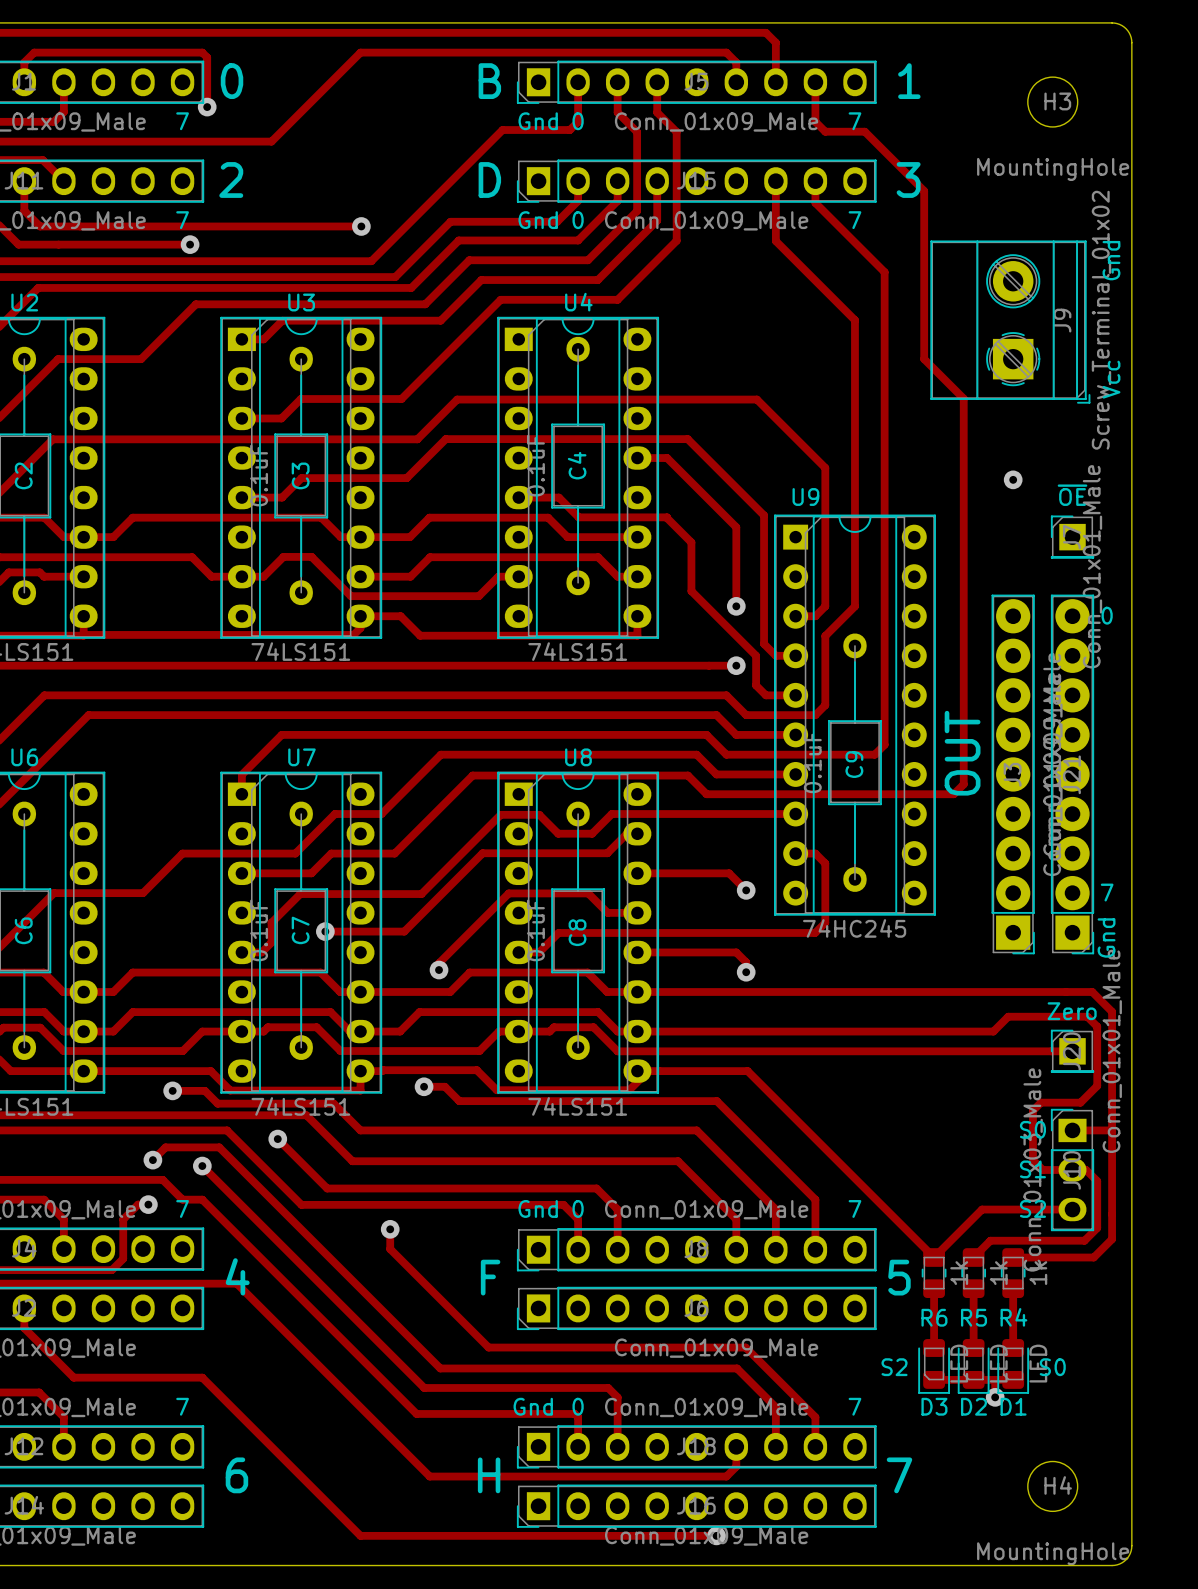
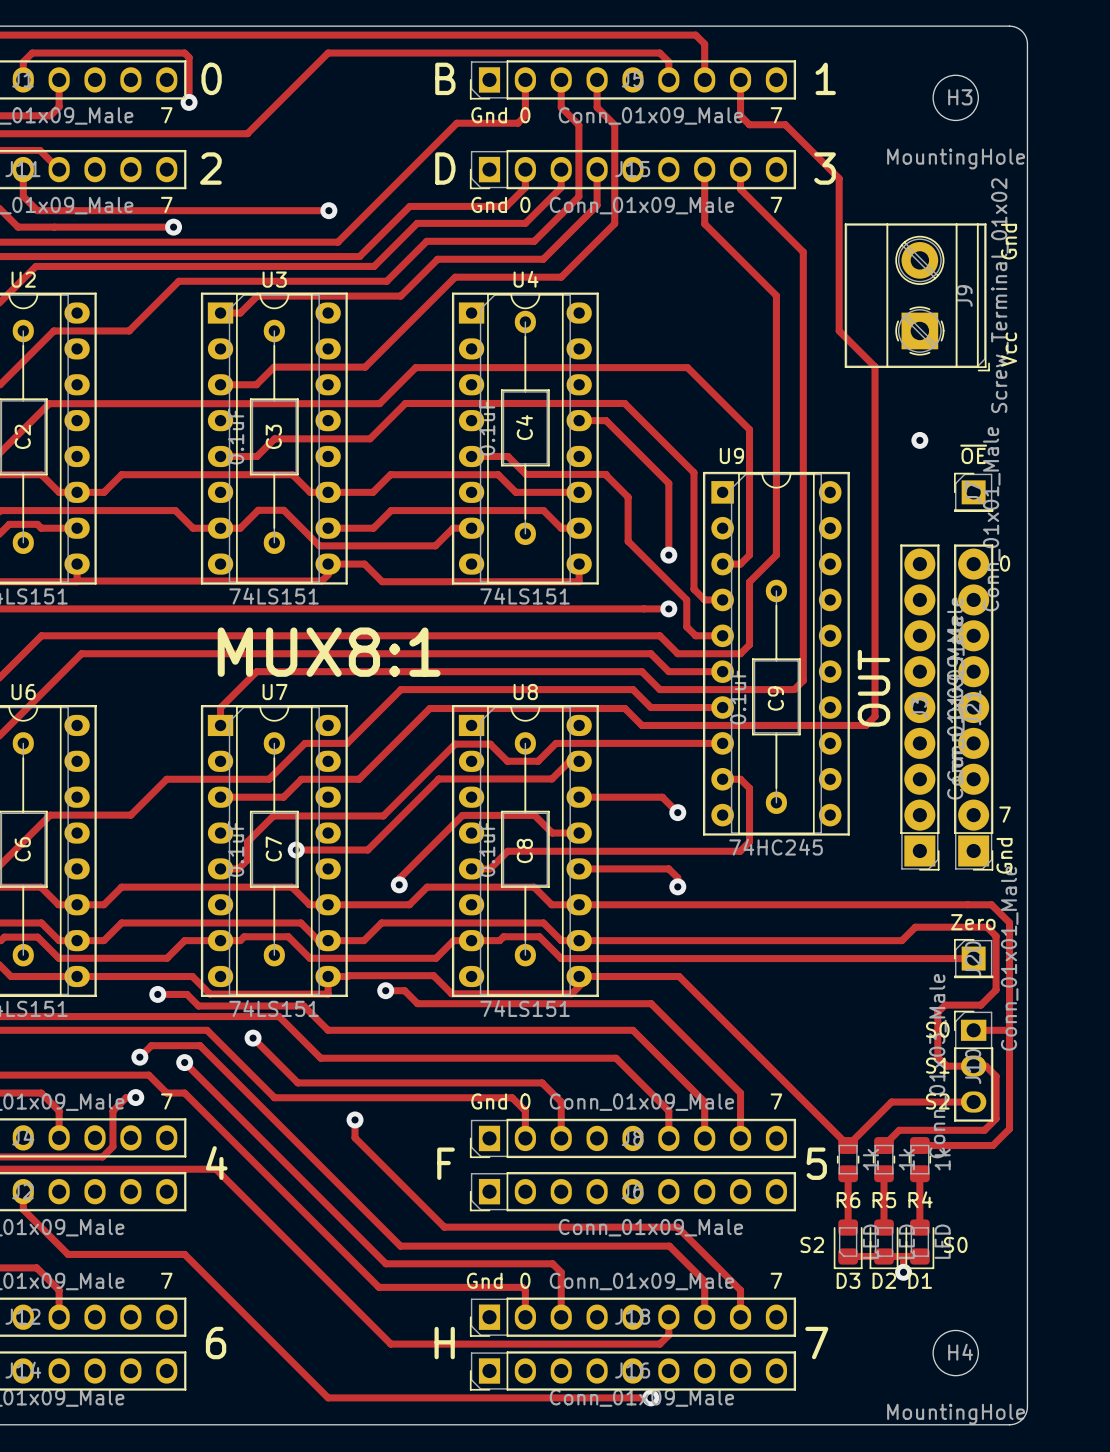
text: none -> MUX8:1 (329, 652)

